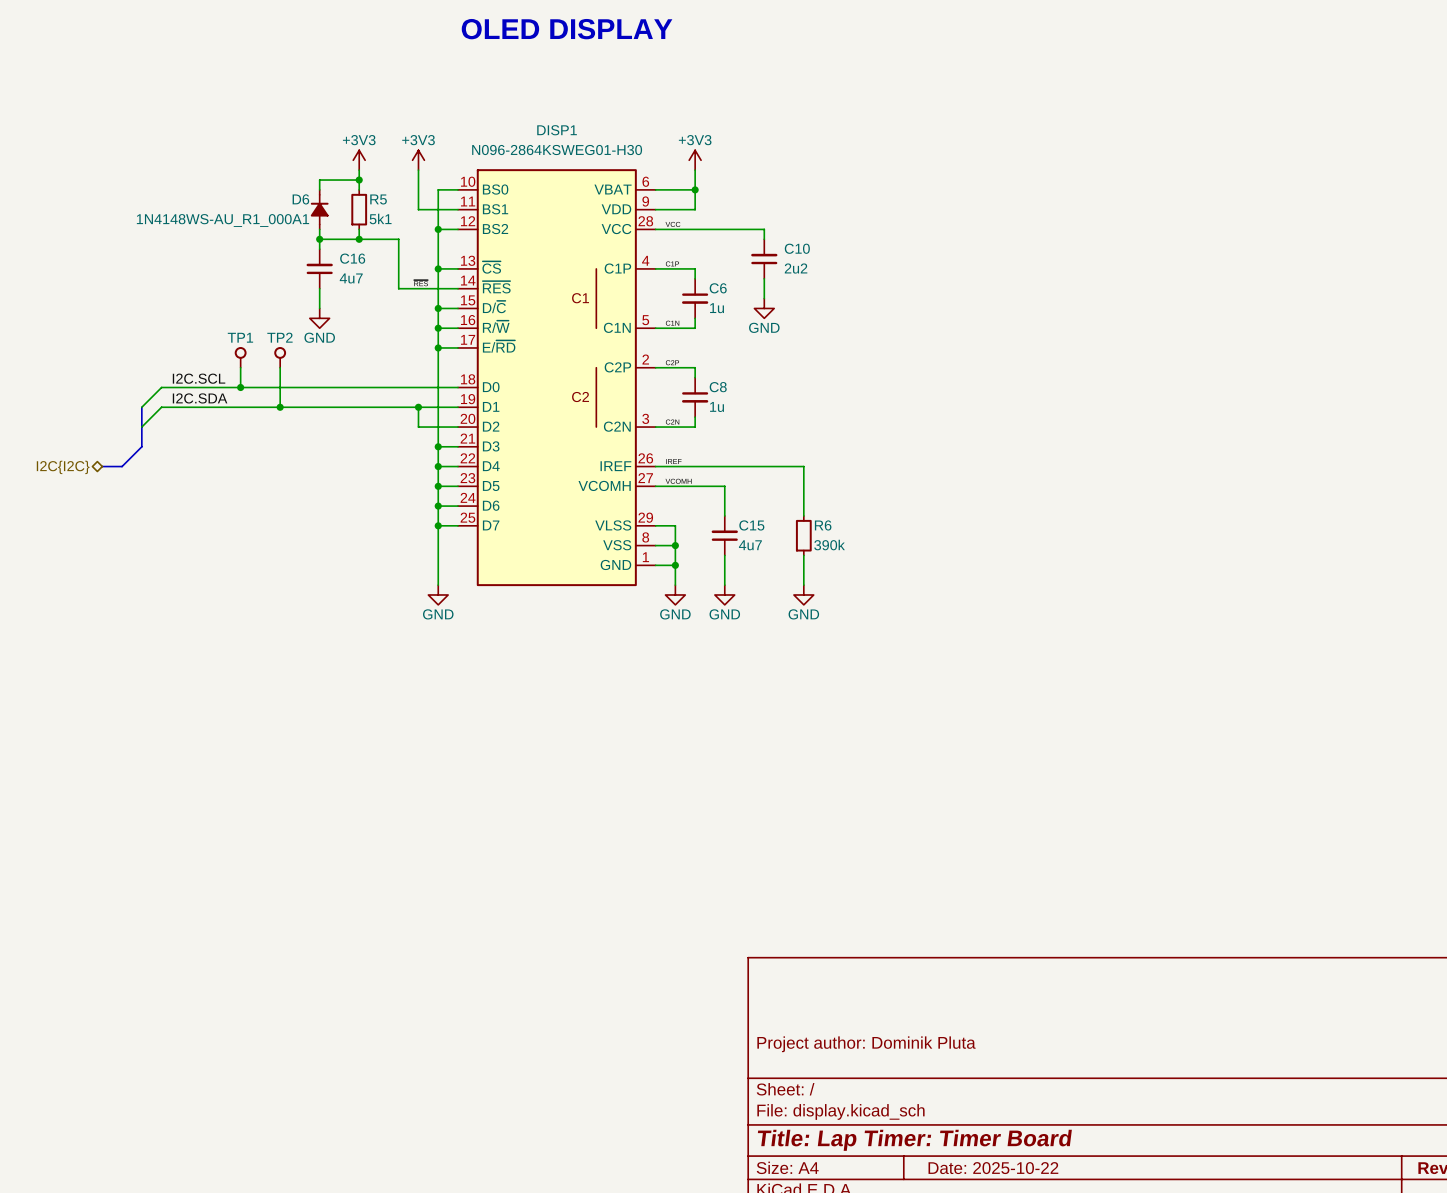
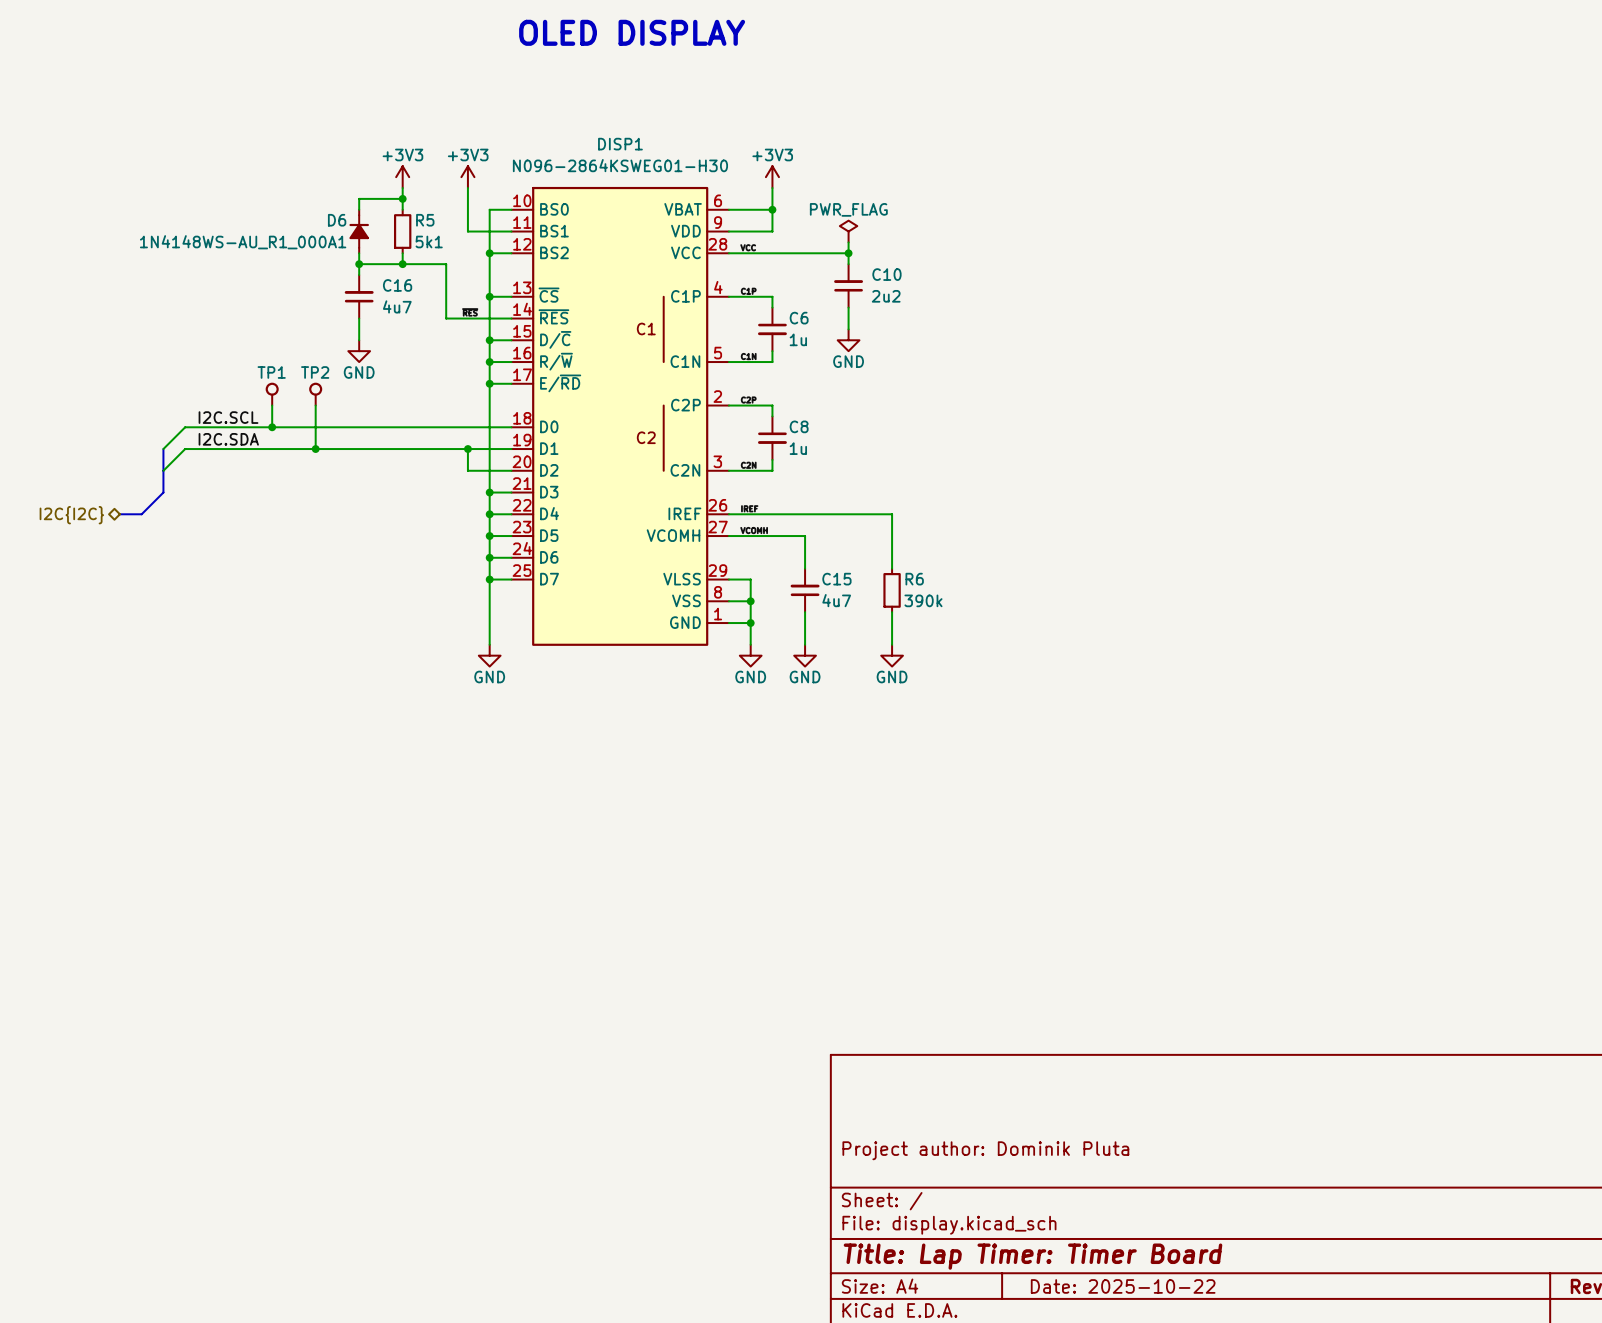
power symbol: none -> PWR_FLAG (848, 231)
wire: none -> (848, 242) (848, 253)
junction: none -> (848, 253)

